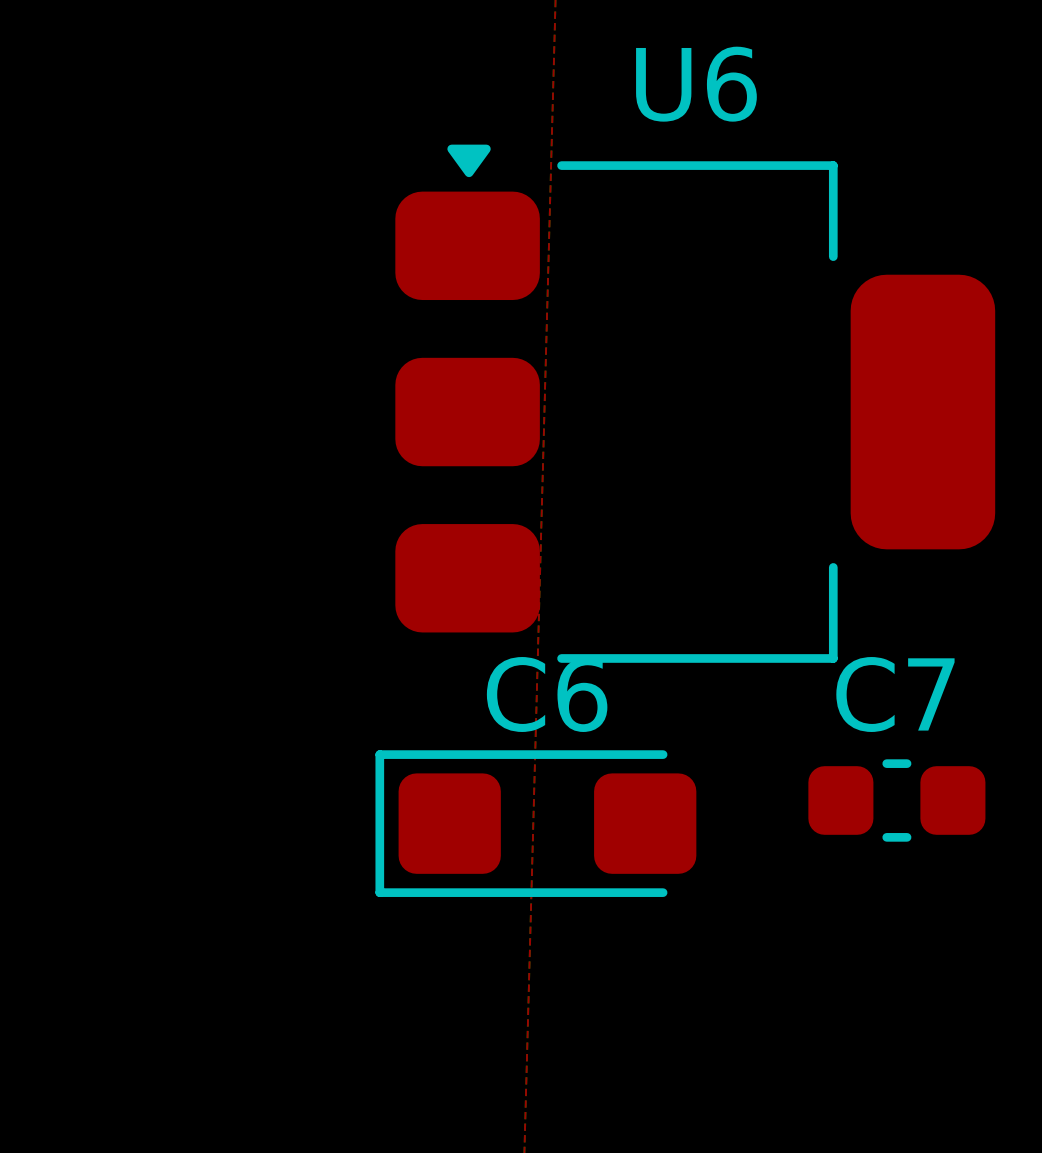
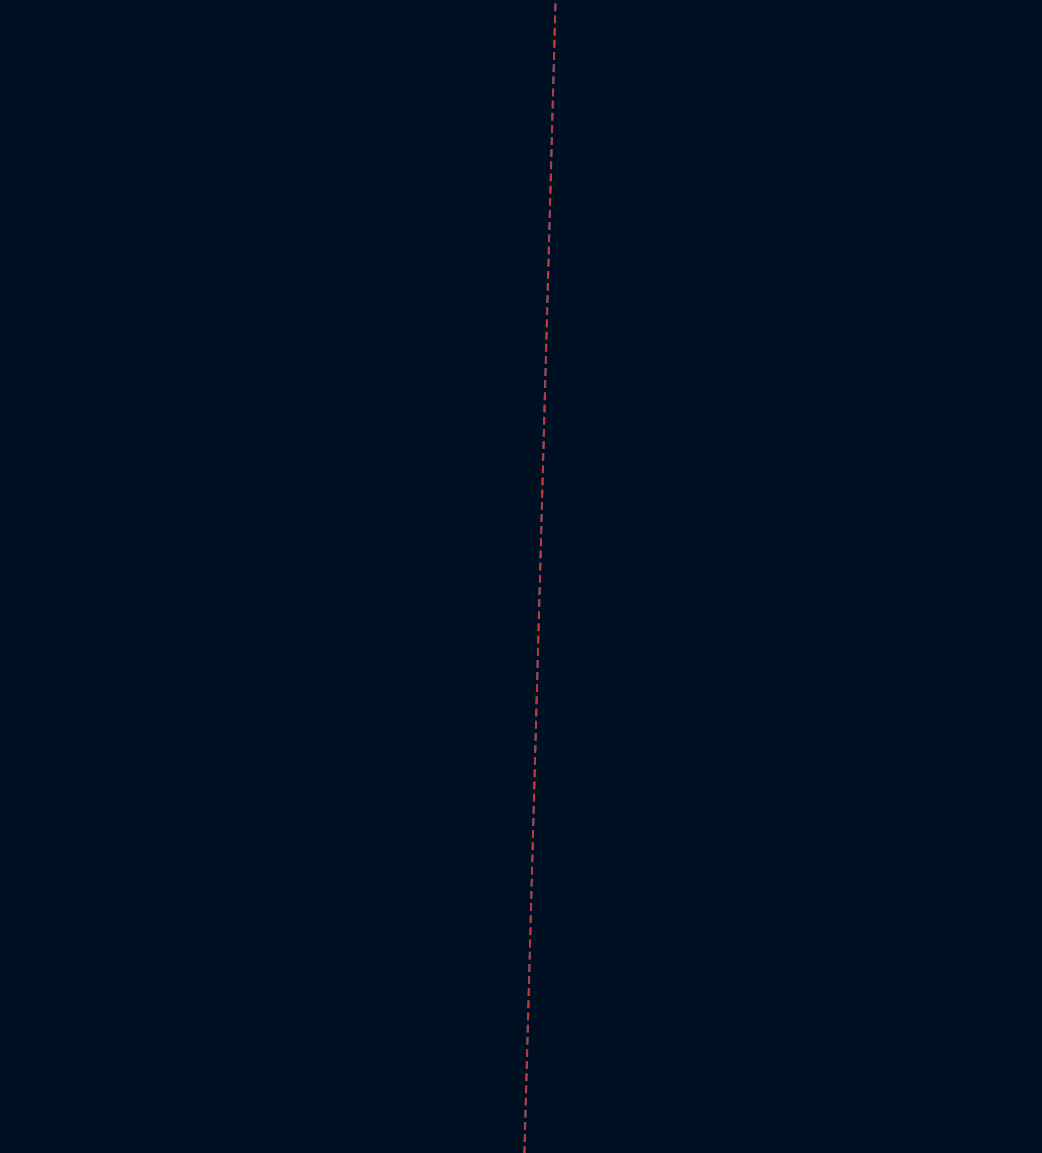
U6: (695, 403) -> none
C7: (896, 800) -> none
C6: (535, 823) -> none

